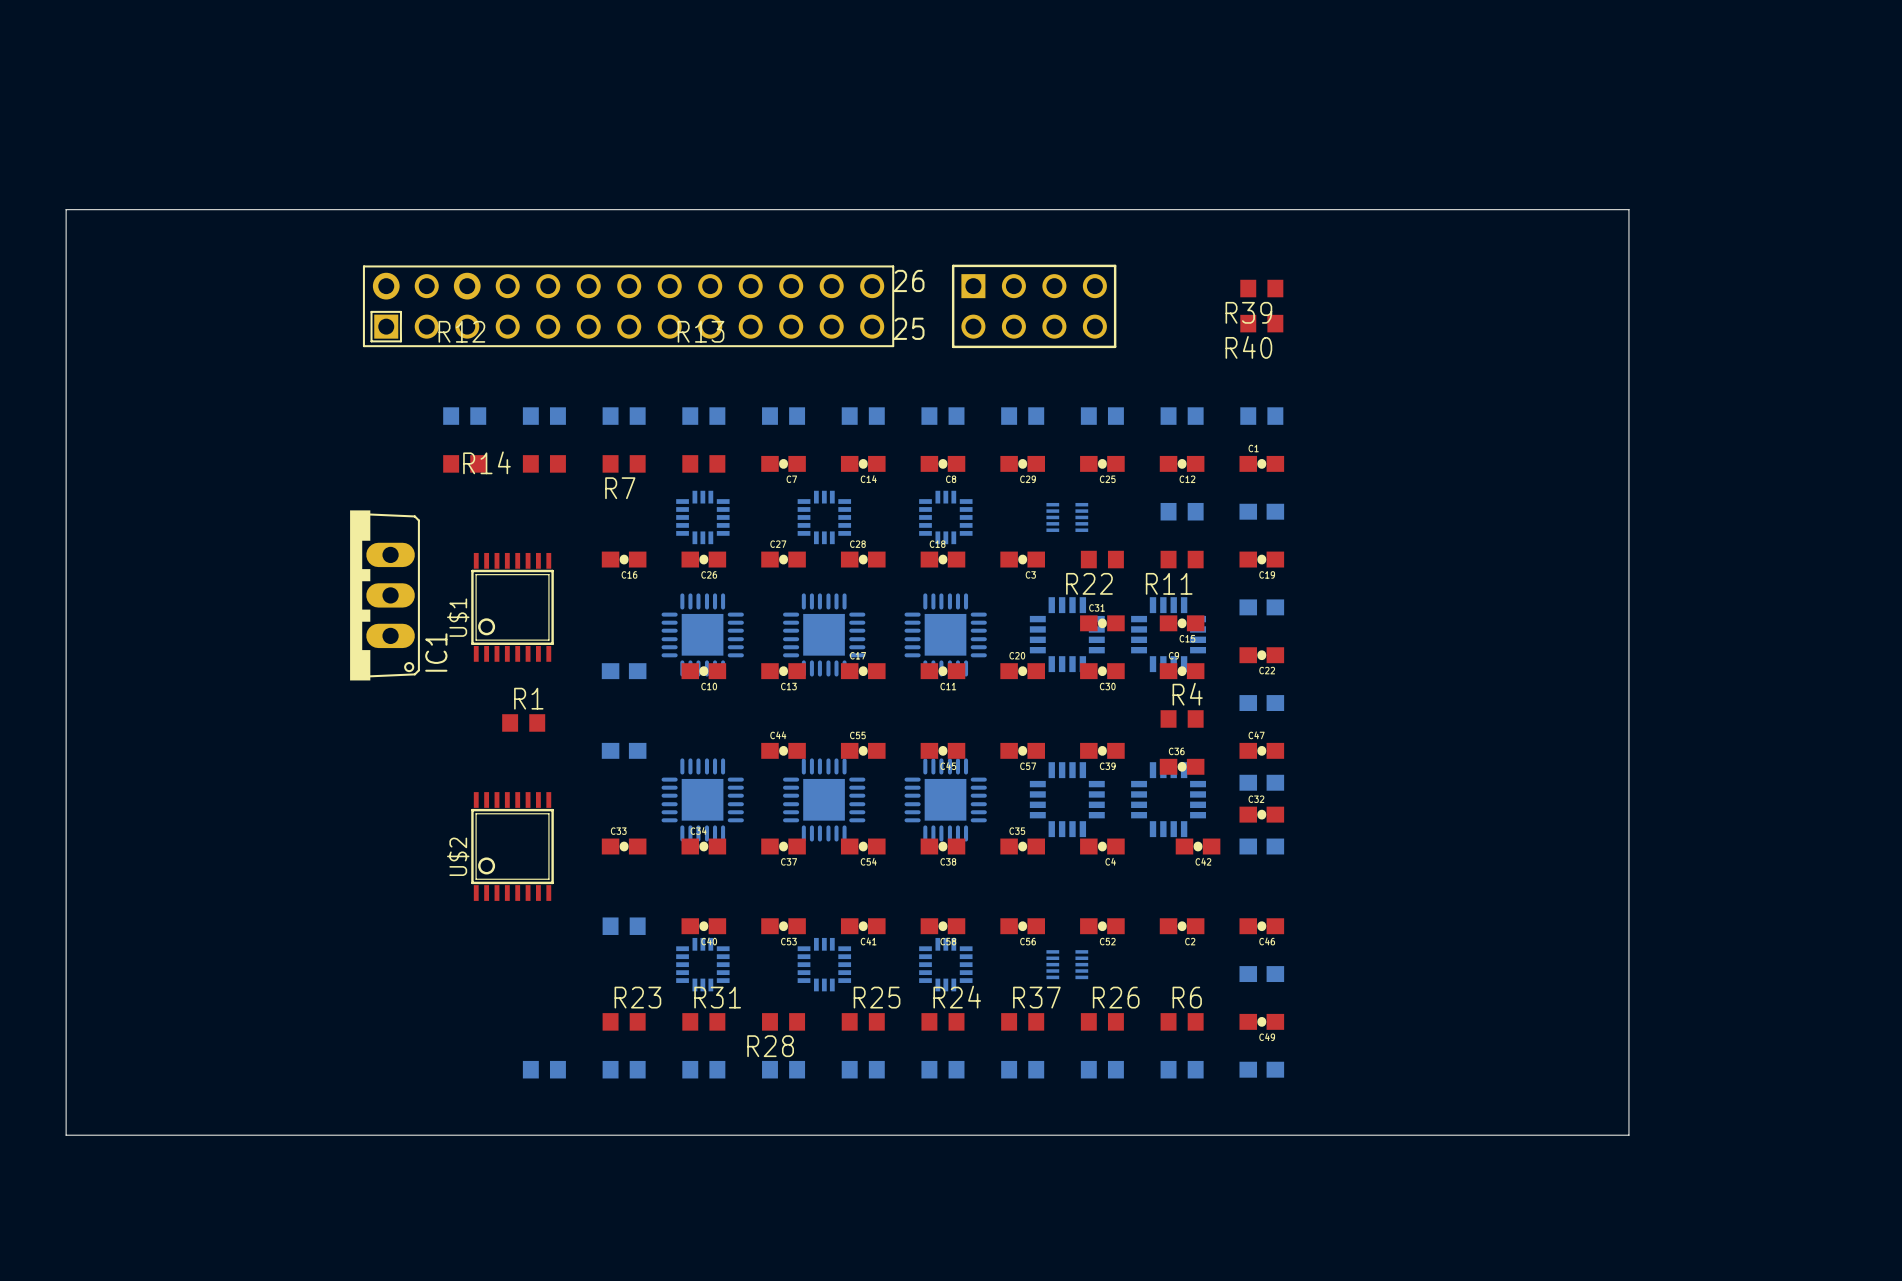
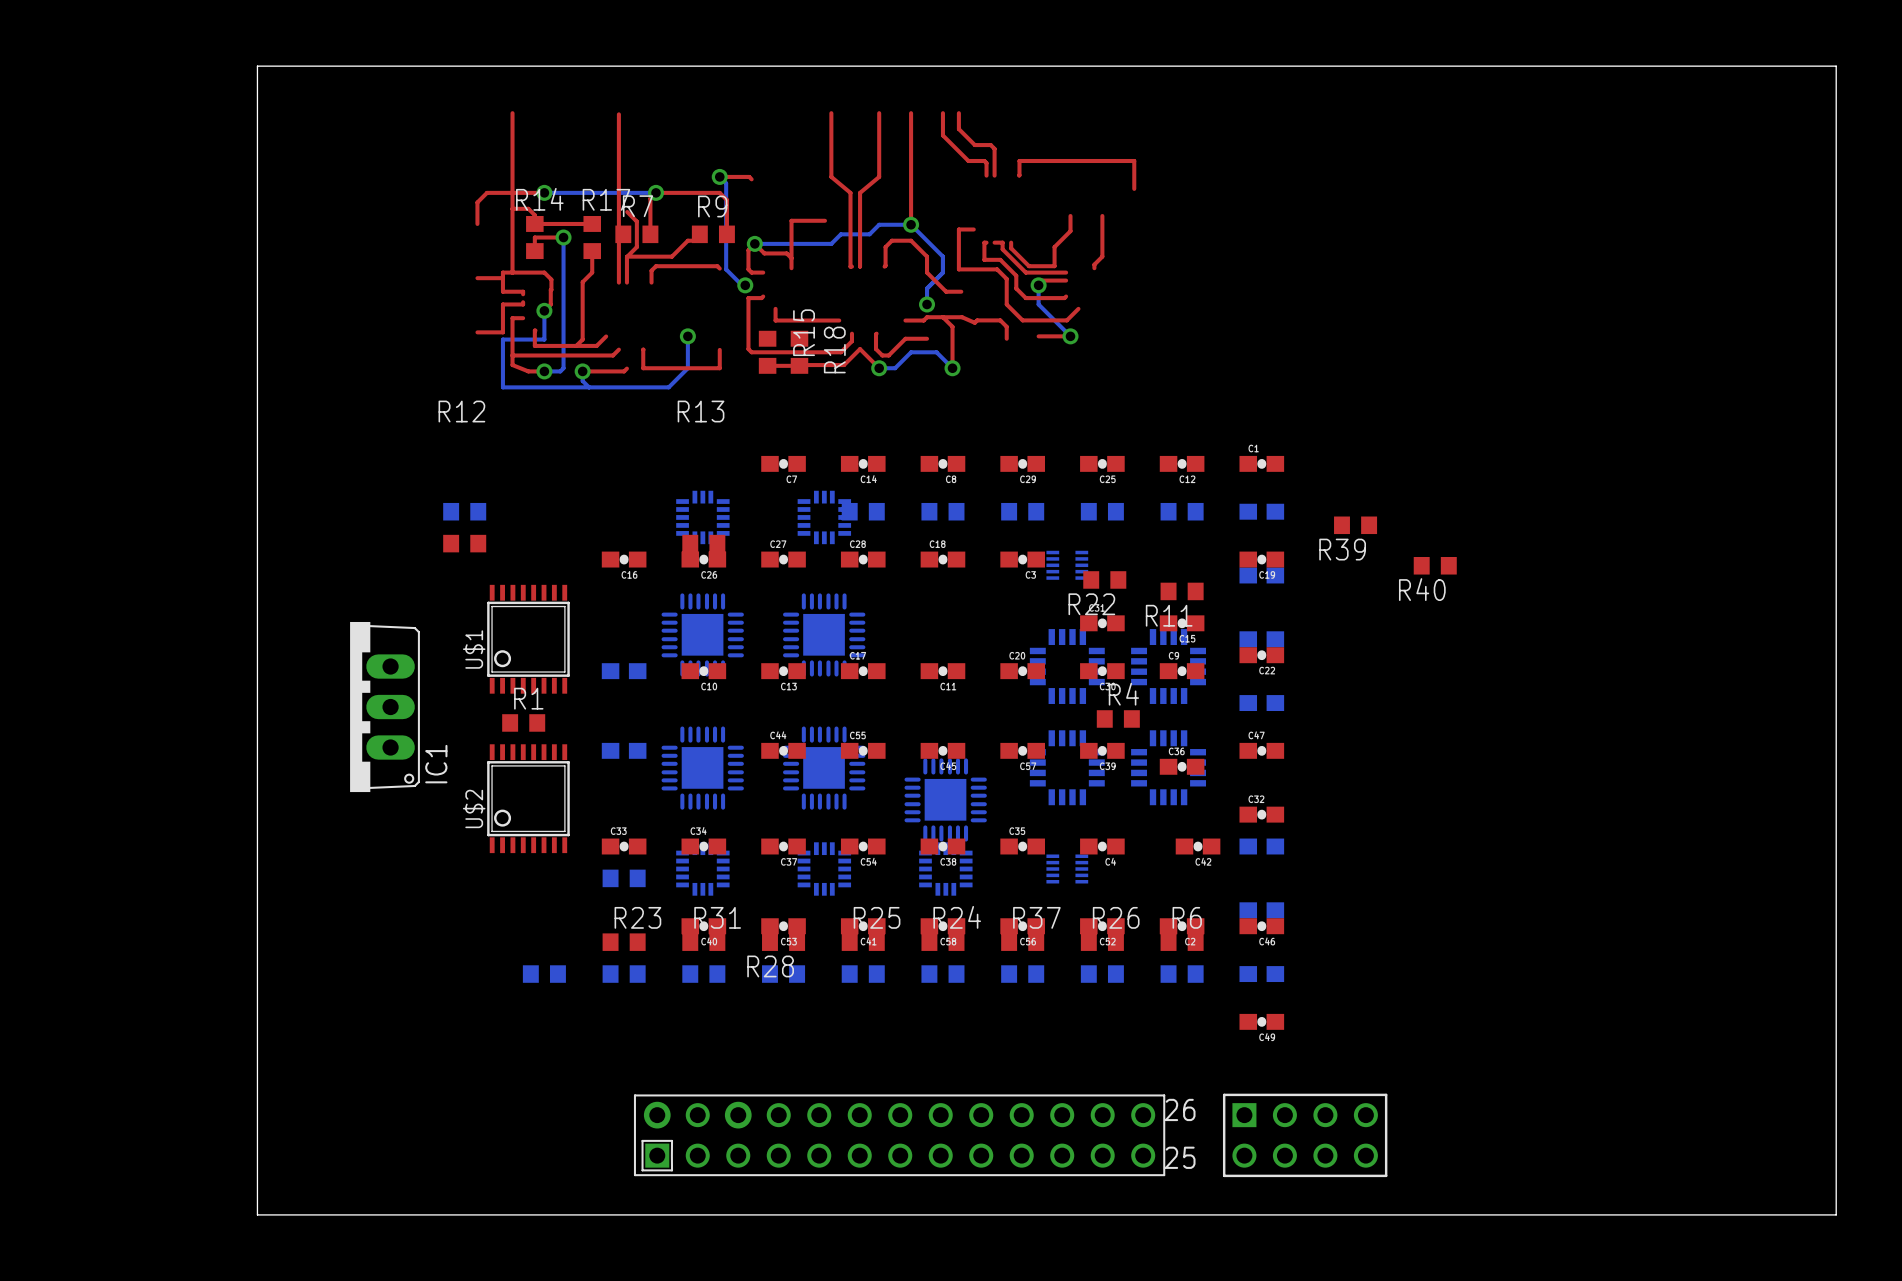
top track: none -> (512, 113) (512, 272)
top track: none -> (831, 113) (831, 176) (850, 192) (851, 266)
top track: none -> (879, 113) (879, 176) (860, 192) (860, 266)
top track: none -> (911, 113) (911, 224)
top track: none -> (942, 113) (942, 135) (968, 160) (984, 160) (986, 163) (986, 175)
top track: none -> (958, 113) (958, 129) (974, 145) (990, 145) (994, 148) (994, 175)
top track: none -> (618, 114) (618, 282)
top track: none -> (1019, 175) (1019, 160) (1134, 160) (1134, 188)
top track: none -> (719, 176) (749, 176) (751, 179)
bottom track: none -> (719, 176) (726, 183) (726, 269) (742, 285) (745, 285)
via: none -> (719, 176)
top track: none -> (544, 192) (487, 192) (477, 202) (477, 223)
bottom track: none -> (544, 192) (656, 192)
via: none -> (544, 192)
via: none -> (656, 192)
top track: none -> (512, 208) (528, 208) (534, 215) (534, 223) (592, 223)
board edge: (66, 209) (1628, 209) (1628, 1135) (66, 1135) (66, 209) -> (257, 66) (257, 1214) (1836, 1214) (1836, 66) (257, 66)
top track: none -> (627, 212) (636, 221) (636, 247) (626, 257) (626, 282)
top track: none -> (1070, 215) (1070, 231) (1054, 247) (1054, 266) (1029, 266) (1011, 248) (1011, 242)
top track: none -> (1102, 215) (1102, 256) (1094, 264) (1094, 268)
top track: none -> (824, 220) (791, 220) (791, 268)
via: none -> (911, 224)
top track: none -> (973, 229) (958, 229) (958, 269) (997, 269) (1006, 278) (1006, 304) (1022, 320) (1066, 320) (1078, 308)
top track: none -> (650, 234) (650, 198) (656, 192) (719, 192) (726, 200) (726, 234)
top track: none -> (699, 234) (703, 240) (687, 240) (671, 256) (627, 256)
top track: none -> (563, 237) (534, 237) (534, 251)
bottom track: none -> (563, 237) (563, 368) (560, 371) (544, 371)
via: none -> (563, 237)
top track: none -> (986, 242) (984, 242) (984, 259) (1000, 259) (1016, 275) (1016, 288) (1025, 298) (1064, 298) (1066, 296)
top track: none -> (994, 242) (1002, 242) (1002, 249) (1025, 272) (1066, 272)
bottom track: none -> (754, 243) (831, 243) (840, 234) (869, 234) (879, 224) (911, 224) (942, 256) (942, 272) (927, 288) (927, 304)
via: none -> (754, 243)
top track: none -> (592, 251) (592, 272) (582, 282) (582, 339) (576, 345)
top track: none -> (791, 258) (786, 253) (764, 253) (754, 243) (748, 250) (748, 269) (751, 272) (763, 272)
top track: none -> (884, 266) (885, 247) (891, 240) (911, 240) (927, 256) (927, 272) (946, 291) (961, 291)
top track: none -> (719, 268) (717, 266) (656, 266) (651, 270) (651, 282)
top track: none -> (477, 278) (502, 278)
top track: none -> (1066, 280) (1038, 280) (1038, 285)
via: none -> (745, 285)
bottom track: none -> (1038, 285) (1038, 304) (1070, 336)
via: none -> (1038, 285)
R39 position: (1261, 288) -> (1355, 525)
top track: none -> (523, 294) (523, 291) (502, 291) (502, 272) (544, 272) (551, 279) (550, 304) (544, 310)
top track: none -> (763, 296) (748, 298) (748, 349) (751, 352) (840, 352) (851, 341) (851, 333)
top track: none -> (523, 302) (523, 304) (502, 304) (502, 332) (477, 332)
via: none -> (927, 304)
part: (739, 306) -> none
top track: none -> (775, 308) (775, 320) (839, 320)
bottom track: none -> (544, 310) (544, 339) (502, 339) (502, 387) (668, 387) (687, 368) (687, 336)
via: none -> (544, 310)
top track: none -> (942, 317) (952, 326) (952, 368)
top track: none -> (523, 318) (512, 318) (512, 365) (528, 371) (544, 371)
top track: none -> (905, 320) (923, 320) (927, 317) (962, 317) (974, 322) (977, 320) (1000, 320) (1006, 326) (1006, 338)
R40 position: (1261, 323) -> (1435, 565)
top track: none -> (535, 330) (534, 345) (596, 345) (606, 336)
top track: none -> (876, 333) (876, 349) (882, 355) (888, 355) (905, 338) (927, 338)
via: none -> (687, 336)
top track: none -> (1038, 336) (1070, 336)
via: none -> (1070, 336)
top track: none -> (618, 349) (613, 355) (512, 355)
top track: none -> (643, 349) (643, 368) (719, 368) (719, 349)
top track: none -> (767, 365) (799, 365)
top track: none -> (626, 368) (624, 371) (582, 371)
top track: none -> (799, 368) (799, 365) (844, 365) (860, 349) (879, 368)
bottom track: none -> (879, 368) (895, 368) (911, 352) (936, 352) (952, 368)
via: none -> (879, 368)
via: none -> (952, 368)
via: none -> (544, 371)
bottom track: none -> (582, 371) (582, 381) (589, 387)
via: none -> (582, 371)
part position: (464, 416) -> (464, 511)
R17 side: bottom (544, 416) -> top (592, 237)
R9 side: bottom (624, 416) -> top (713, 234)
R15 side: bottom (703, 416) -> top (767, 352)
R18 side: bottom (783, 416) -> top (799, 352)
part: (863, 416) -> none
part: (942, 416) -> none
part: (1022, 416) -> none
part: (1102, 416) -> none
part: (1182, 416) -> none
part: (1261, 416) -> none
R12 position: (464, 463) -> (464, 543)
R14 rotation: 0° (544, 463) -> 90° clockwise (534, 237)
R14 position: (544, 463) -> (534, 237)
R7 position: (624, 463) -> (636, 234)
R13 position: (703, 463) -> (703, 543)
R7 name position: R7 (620, 488) -> R7 (638, 206)
part footprint: [919, 490, 973, 545] -> [921, 502, 965, 521]
part: none -> (863, 511)
part: none -> (1022, 511)
part: none -> (1102, 511)
part position: (1067, 517) -> (1067, 565)
R22 position: (1102, 559) -> (1104, 579)
R11 position: (1182, 559) -> (1182, 591)
part: none -> (1261, 575)
IC1 position: (384, 595) -> (384, 707)
U$1 position: (512, 607) -> (528, 639)
part: (1261, 607) -> none
part: (945, 634) -> none
part position: (1067, 634) -> (1067, 666)
part position: (1168, 634) -> (1168, 666)
part: none -> (1261, 639)
R4 position: (1182, 718) -> (1118, 718)
part: (1261, 782) -> none
part position: (702, 799) -> (702, 768)
part position: (824, 799) -> (824, 768)
part position: (1067, 799) -> (1067, 767)
part position: (1168, 799) -> (1168, 767)
U$2 position: (512, 846) -> (528, 798)
part: none -> (702, 868)
part: none -> (824, 868)
part: none -> (945, 868)
part: none -> (624, 878)
part: none -> (1261, 910)
part: (624, 926) -> none
part footprint: [676, 937, 730, 992] -> [682, 965, 726, 983]
part footprint: [919, 937, 973, 992] -> [921, 965, 965, 983]
part: (824, 964) -> none
part position: (1067, 964) -> (1067, 868)
part: none -> (544, 974)
part: none -> (624, 974)
part: none -> (783, 974)
part: none -> (863, 974)
part: none -> (1022, 974)
part: none -> (1102, 974)
part: none -> (1182, 974)
R23 position: (624, 1021) -> (624, 942)
R31 position: (703, 1021) -> (703, 942)
R28 position: (783, 1021) -> (783, 942)
R25 position: (863, 1021) -> (863, 942)
R24 position: (942, 1021) -> (942, 942)
R37 position: (1022, 1021) -> (1022, 942)
R26 position: (1102, 1021) -> (1102, 942)
R6 position: (1182, 1021) -> (1182, 942)
part: (544, 1069) -> none
part: (624, 1069) -> none
part: (703, 1069) -> none
part: (783, 1069) -> none
part: (863, 1069) -> none
part: (942, 1069) -> none
part: (1022, 1069) -> none
part: (1102, 1069) -> none
part: (1182, 1069) -> none
part: (1261, 1069) -> none
part: none -> (1010, 1135)

